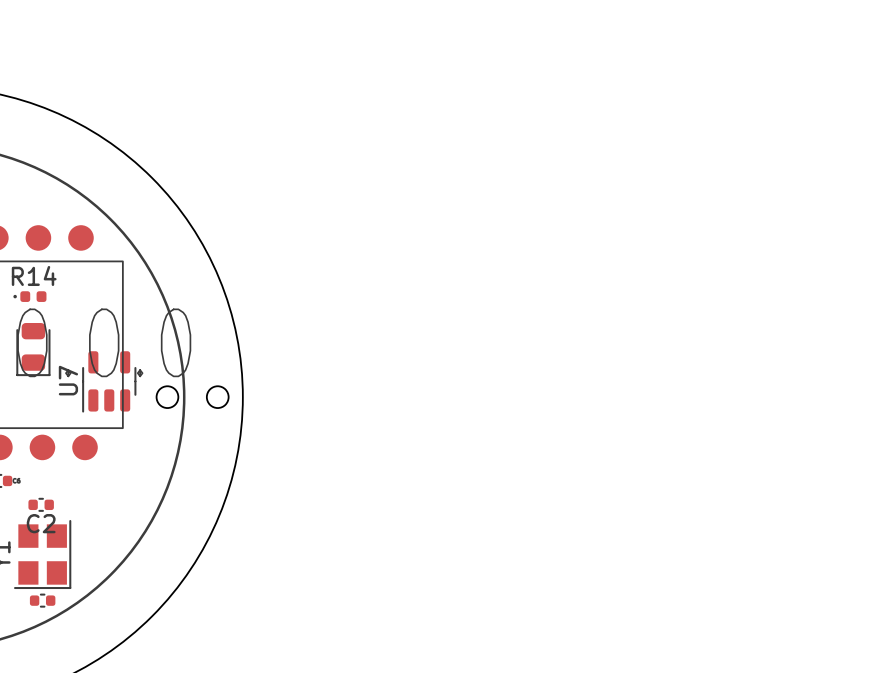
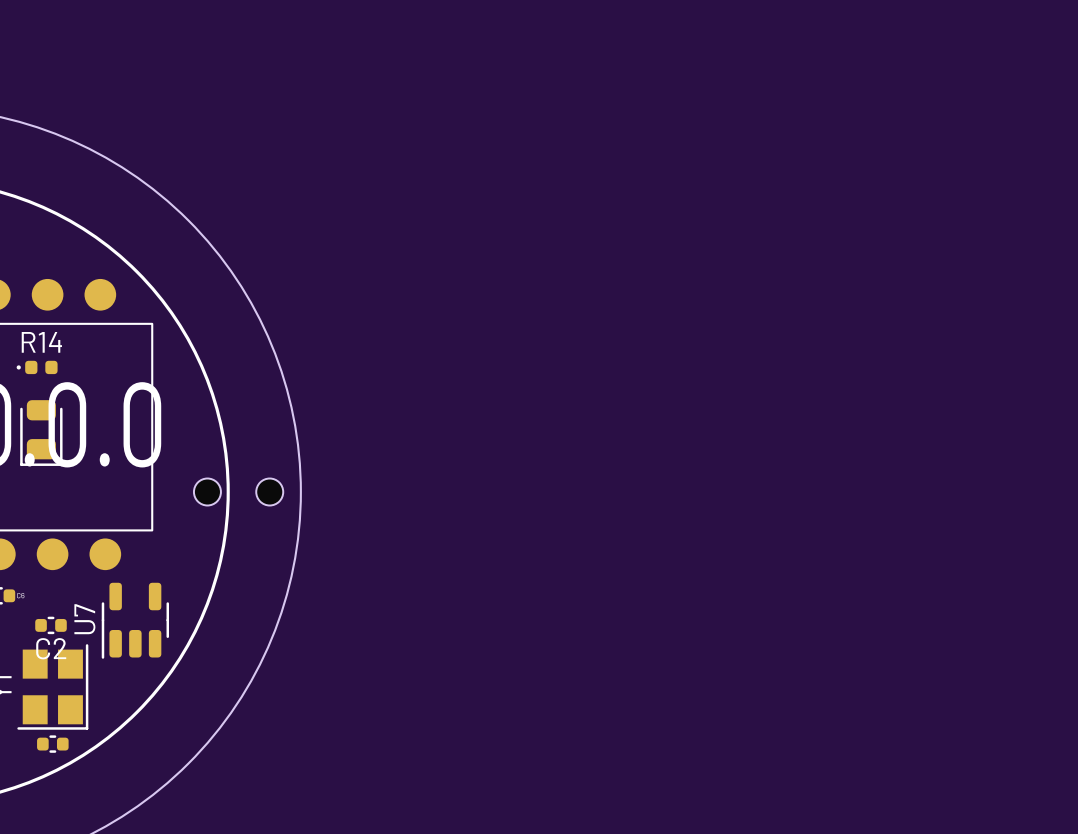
U7 position: (109, 381) -> (135, 620)

